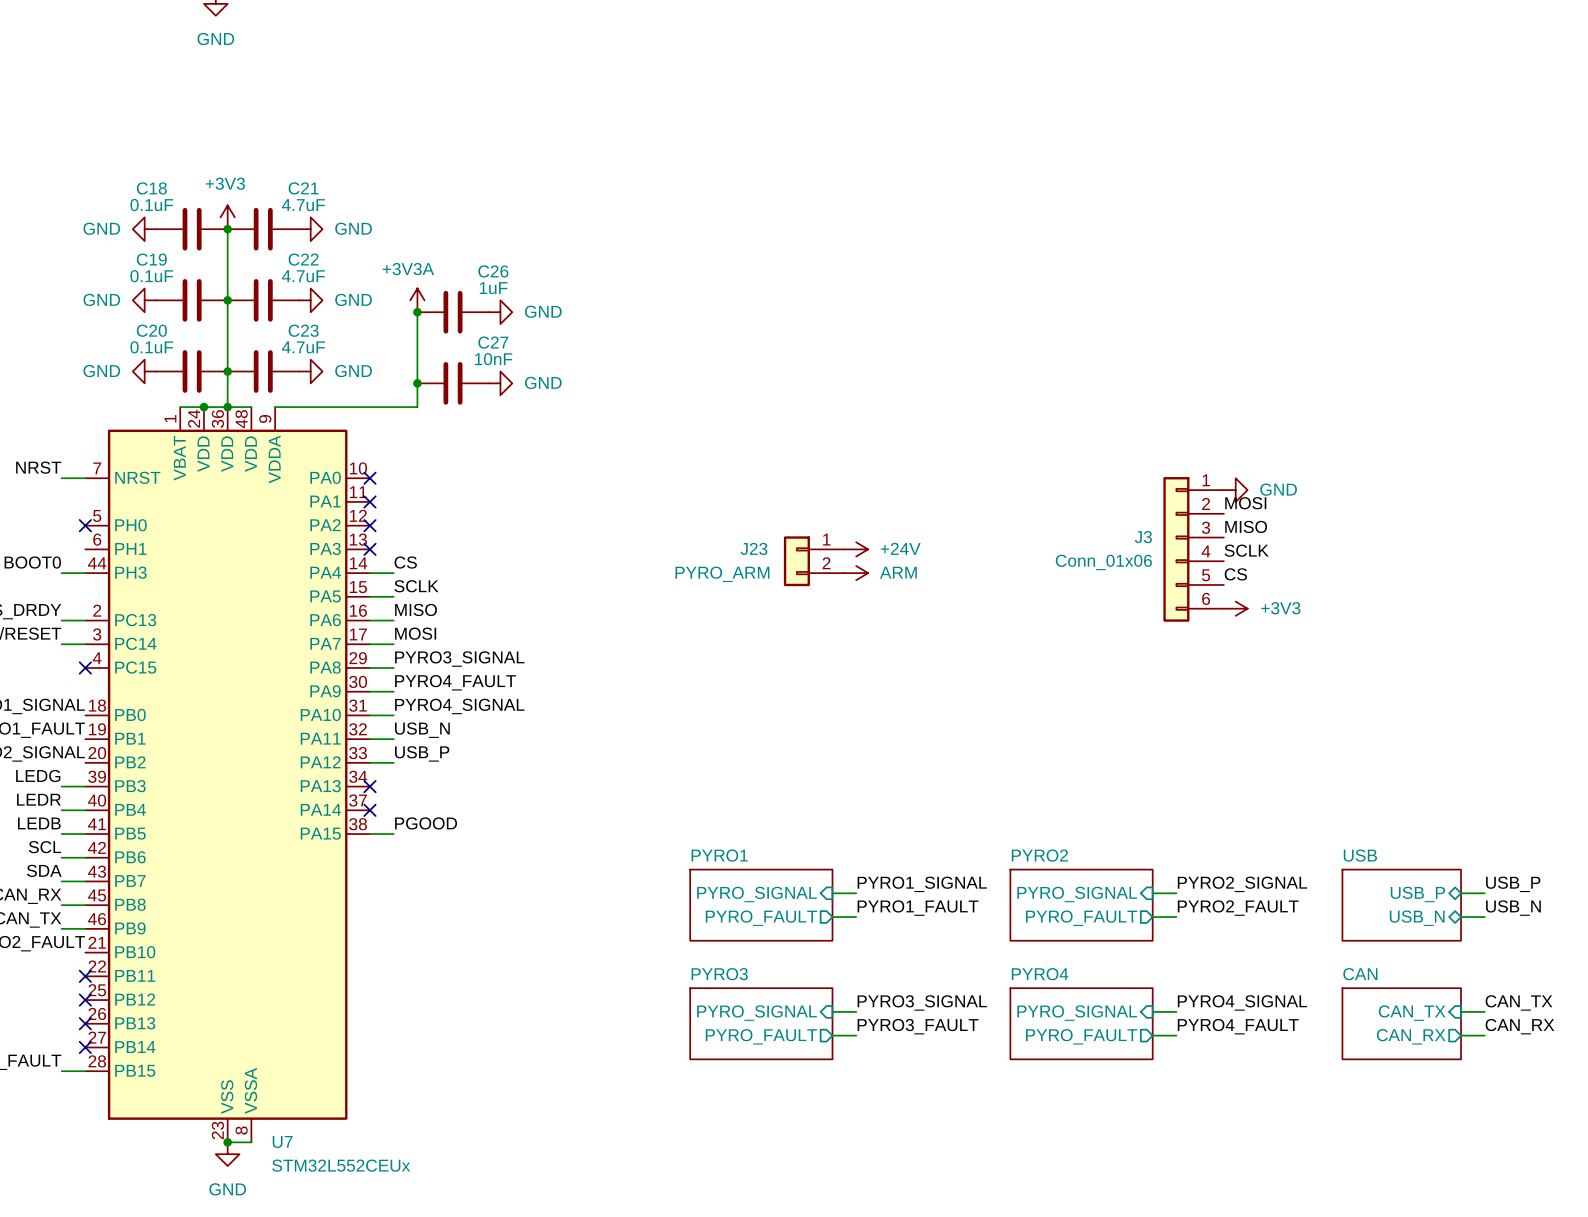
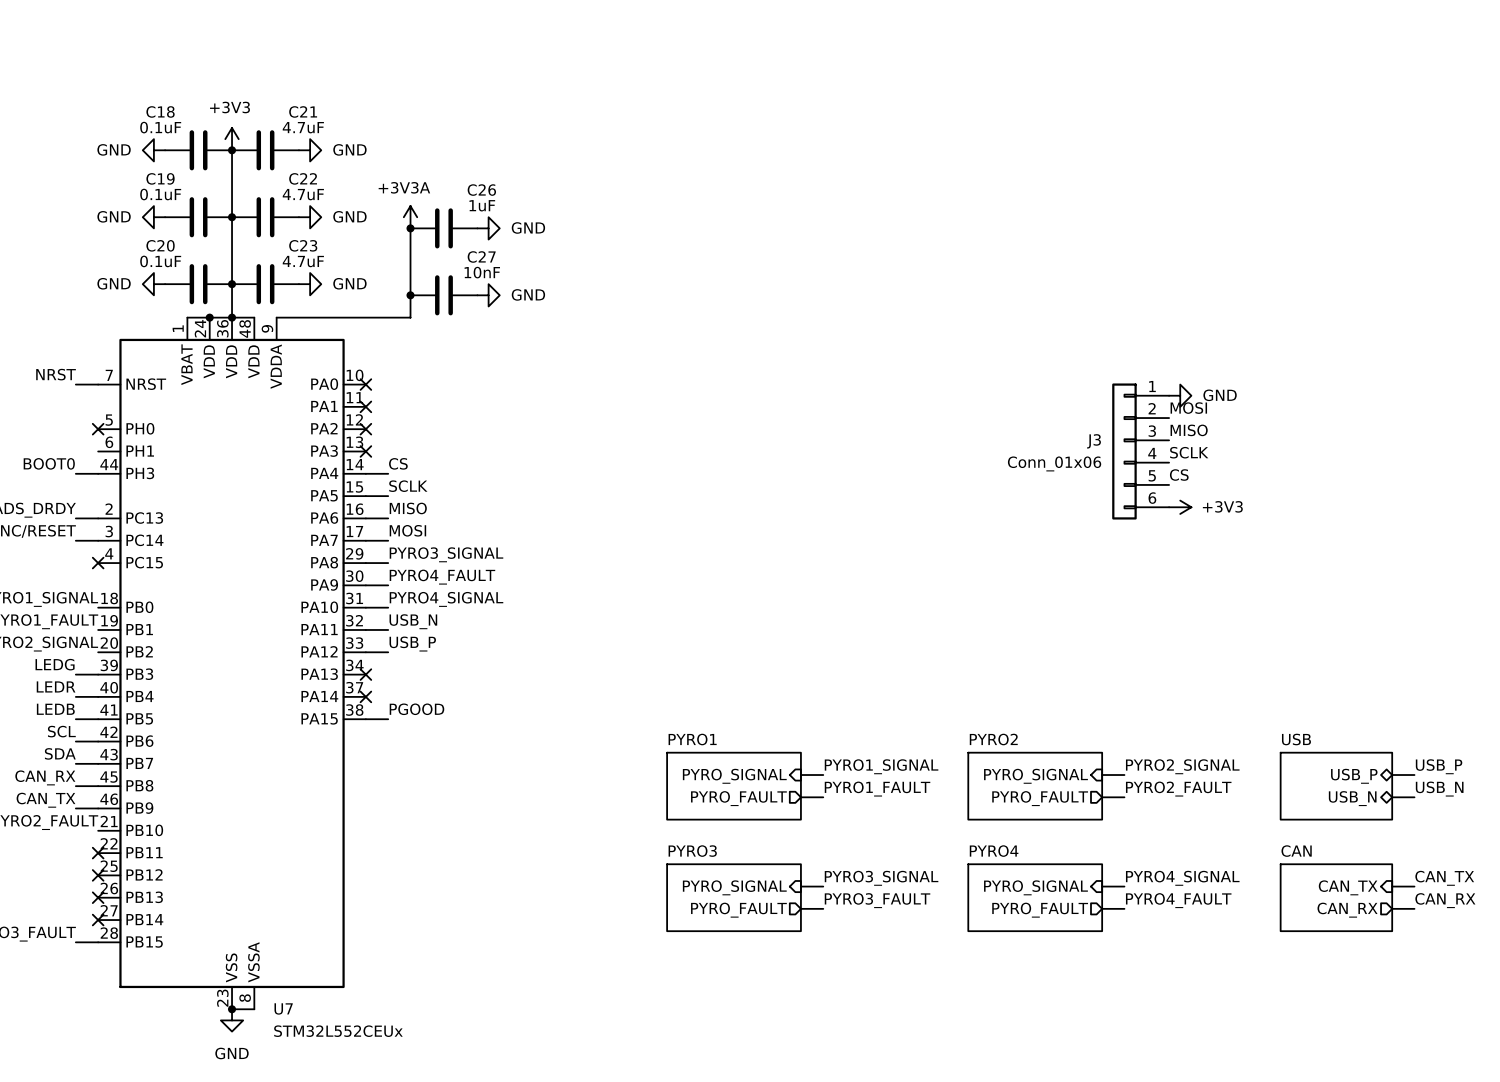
power symbol: +24V (856, 549) -> none
J23: PYRO_ARM (814, 561) -> none
power symbol: ARM (856, 573) -> none

